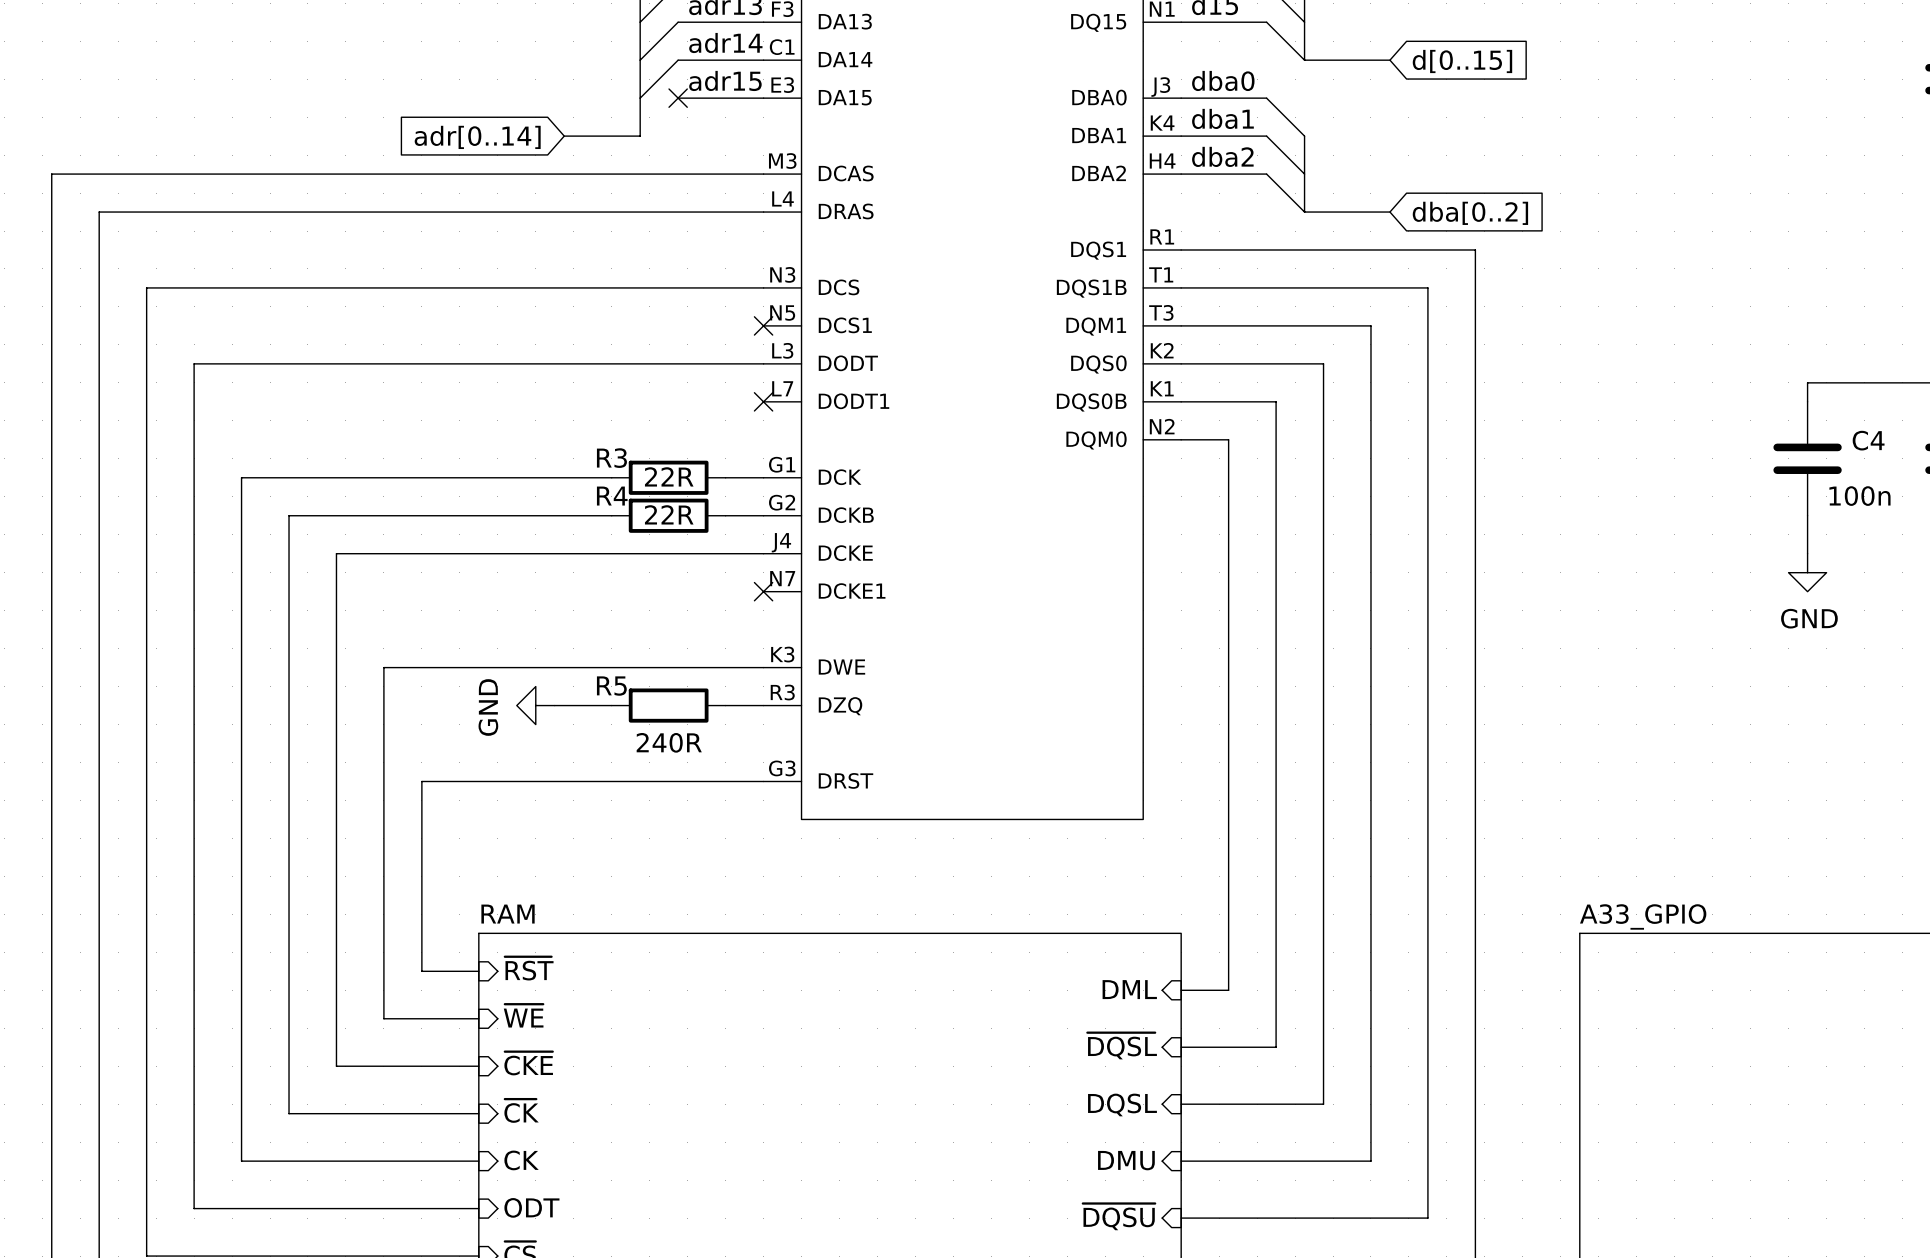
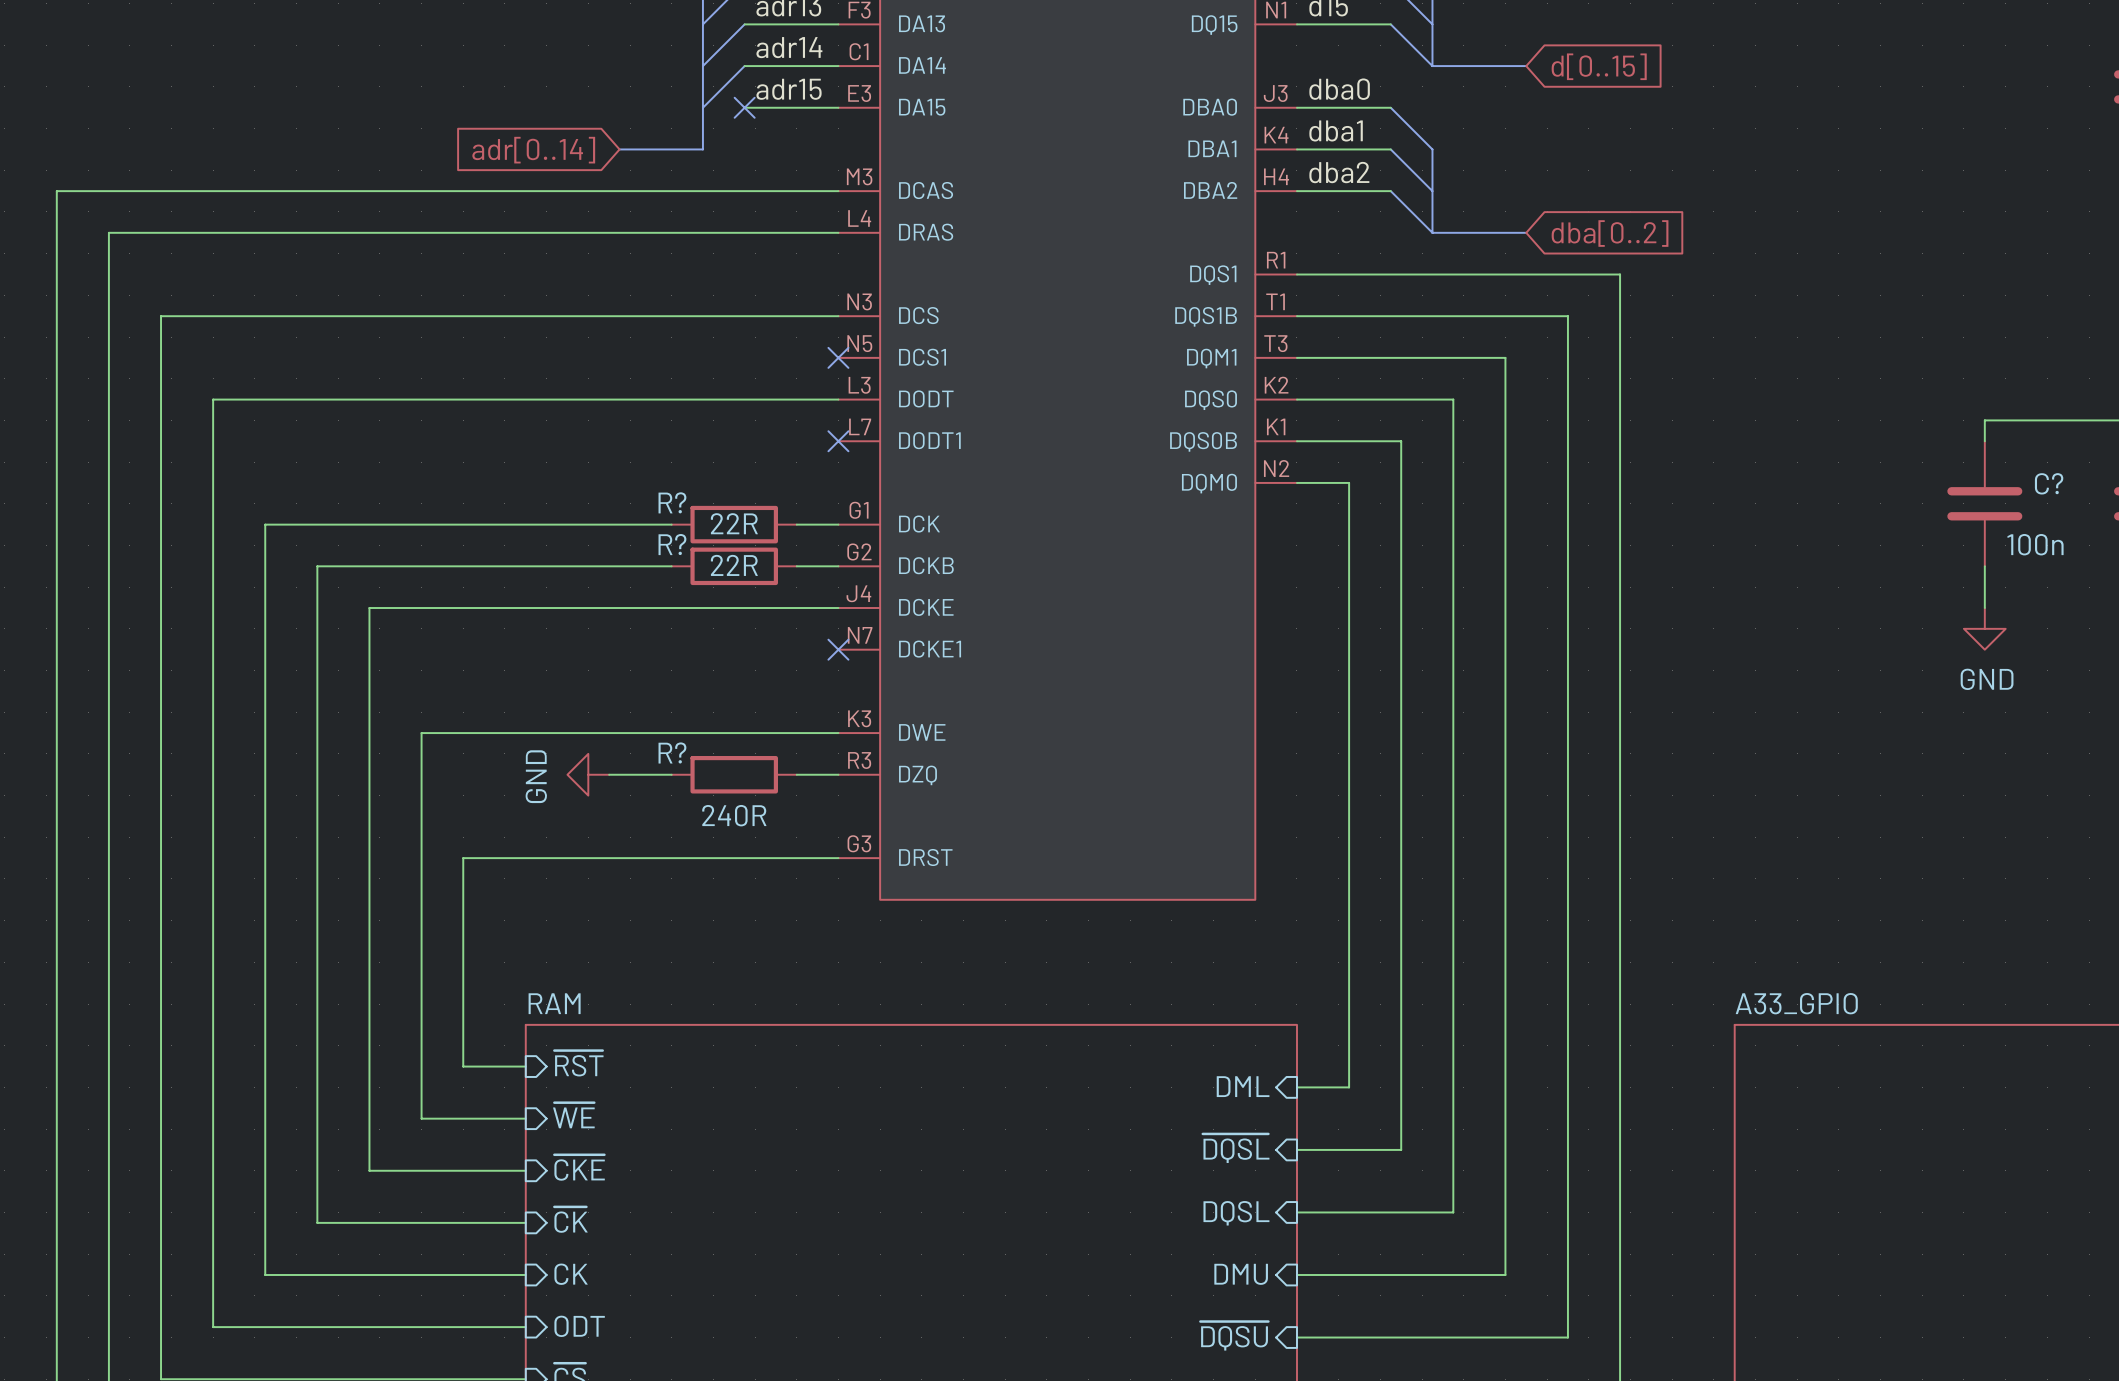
C4 name: C4 (1868, 440) -> C? (2049, 483)
R3 name: R3 (611, 458) -> R? (672, 502)
R4 name: R4 (612, 496) -> R? (672, 544)
R5 name: R5 (611, 686) -> R? (672, 752)

